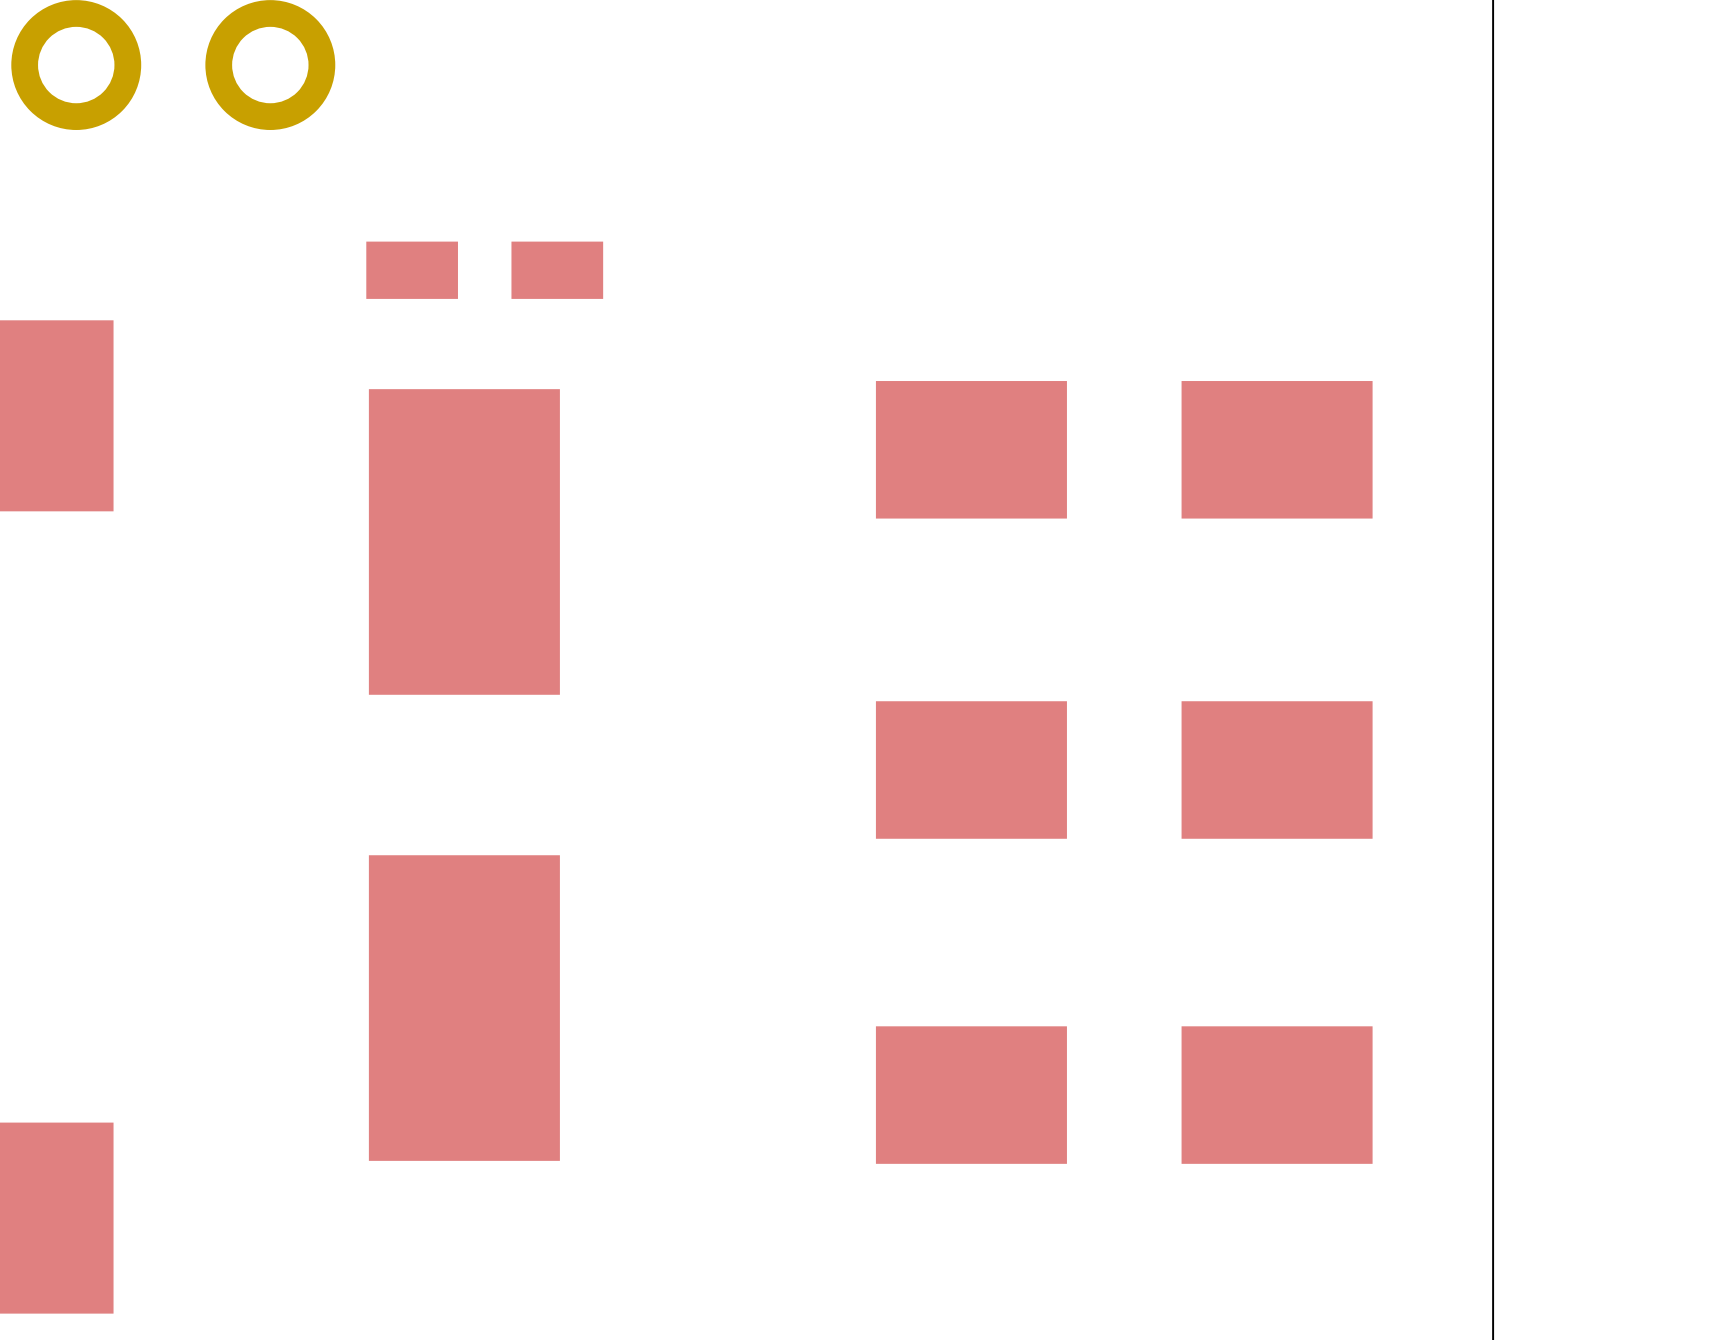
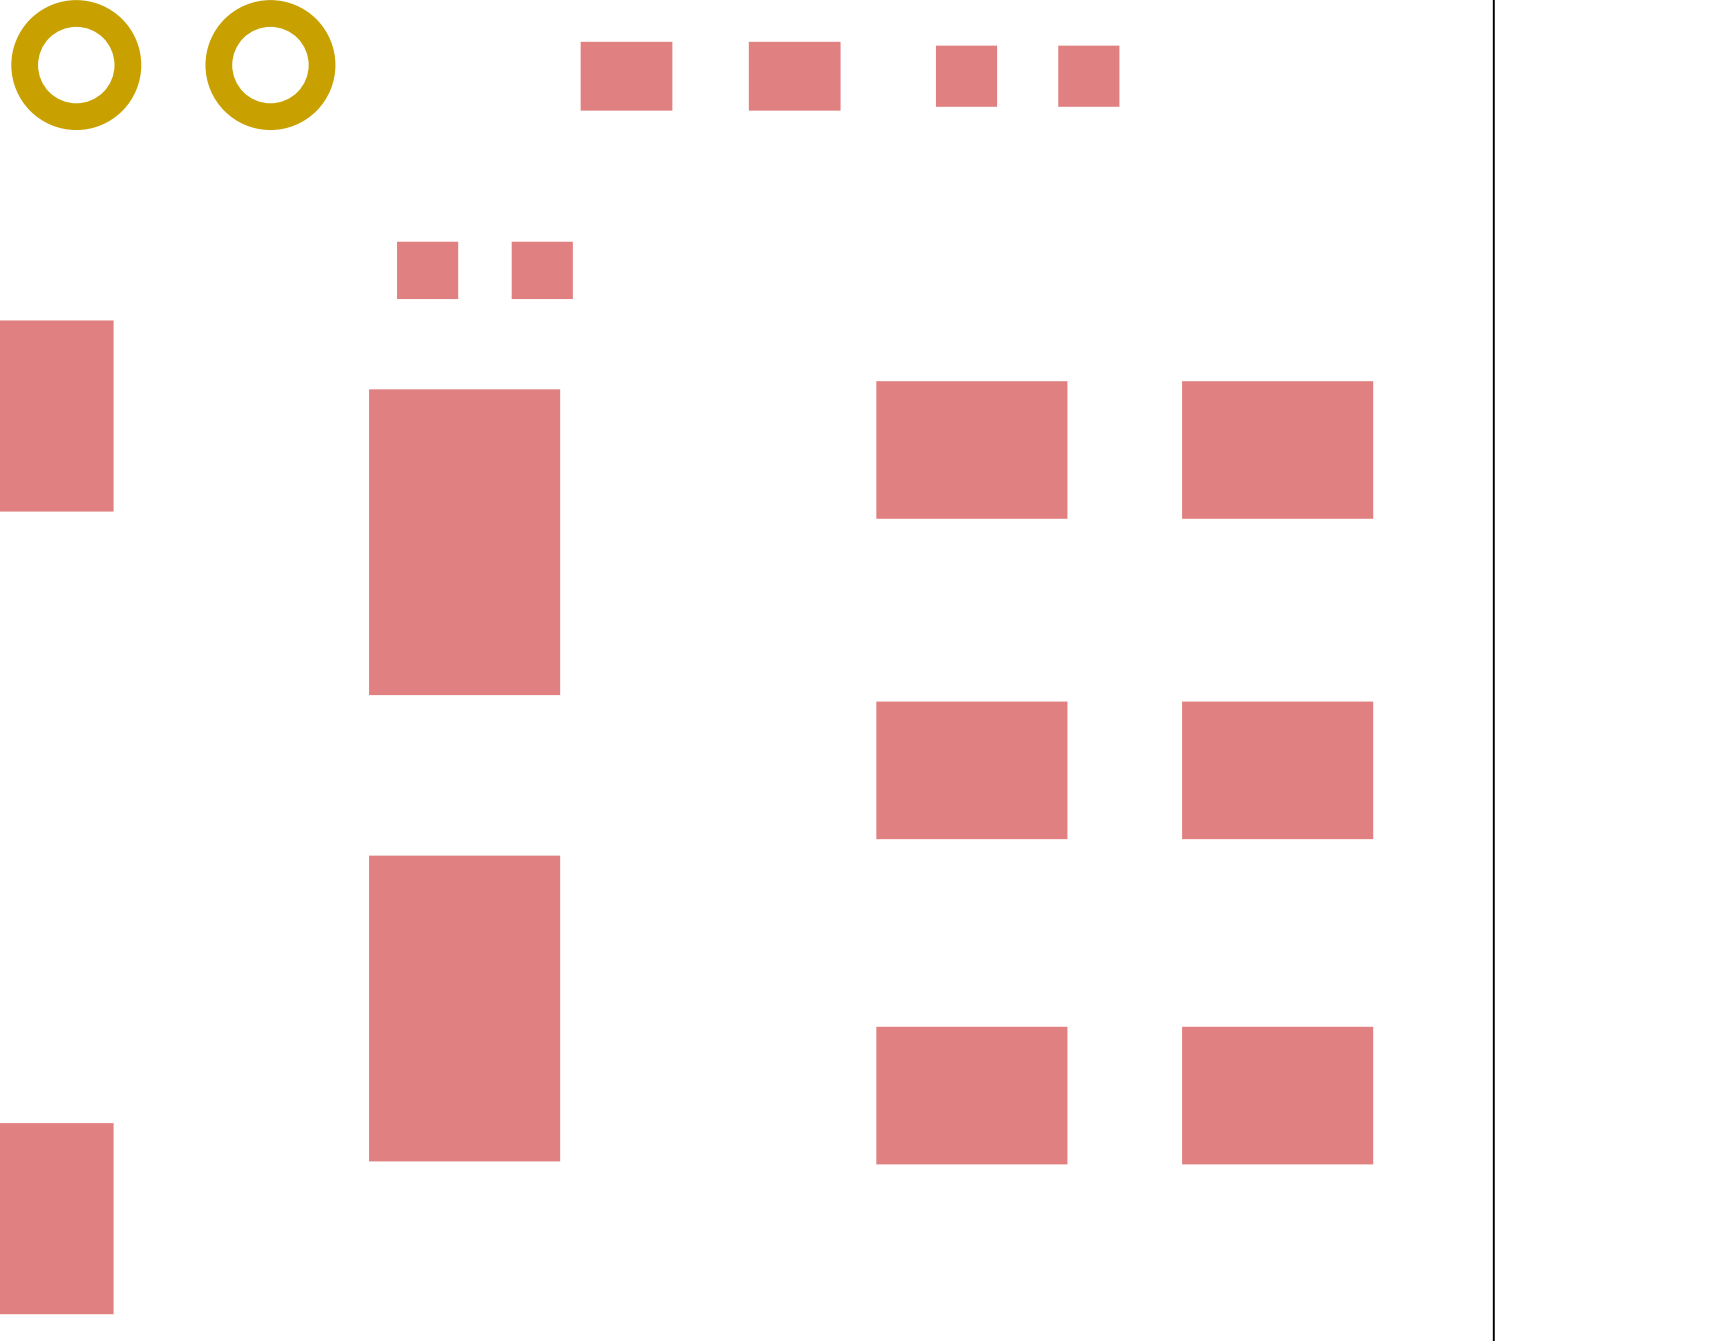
part: none -> (710, 76)
part: none -> (1027, 76)
part footprint: [366, 241, 604, 299] -> [397, 241, 573, 300]

